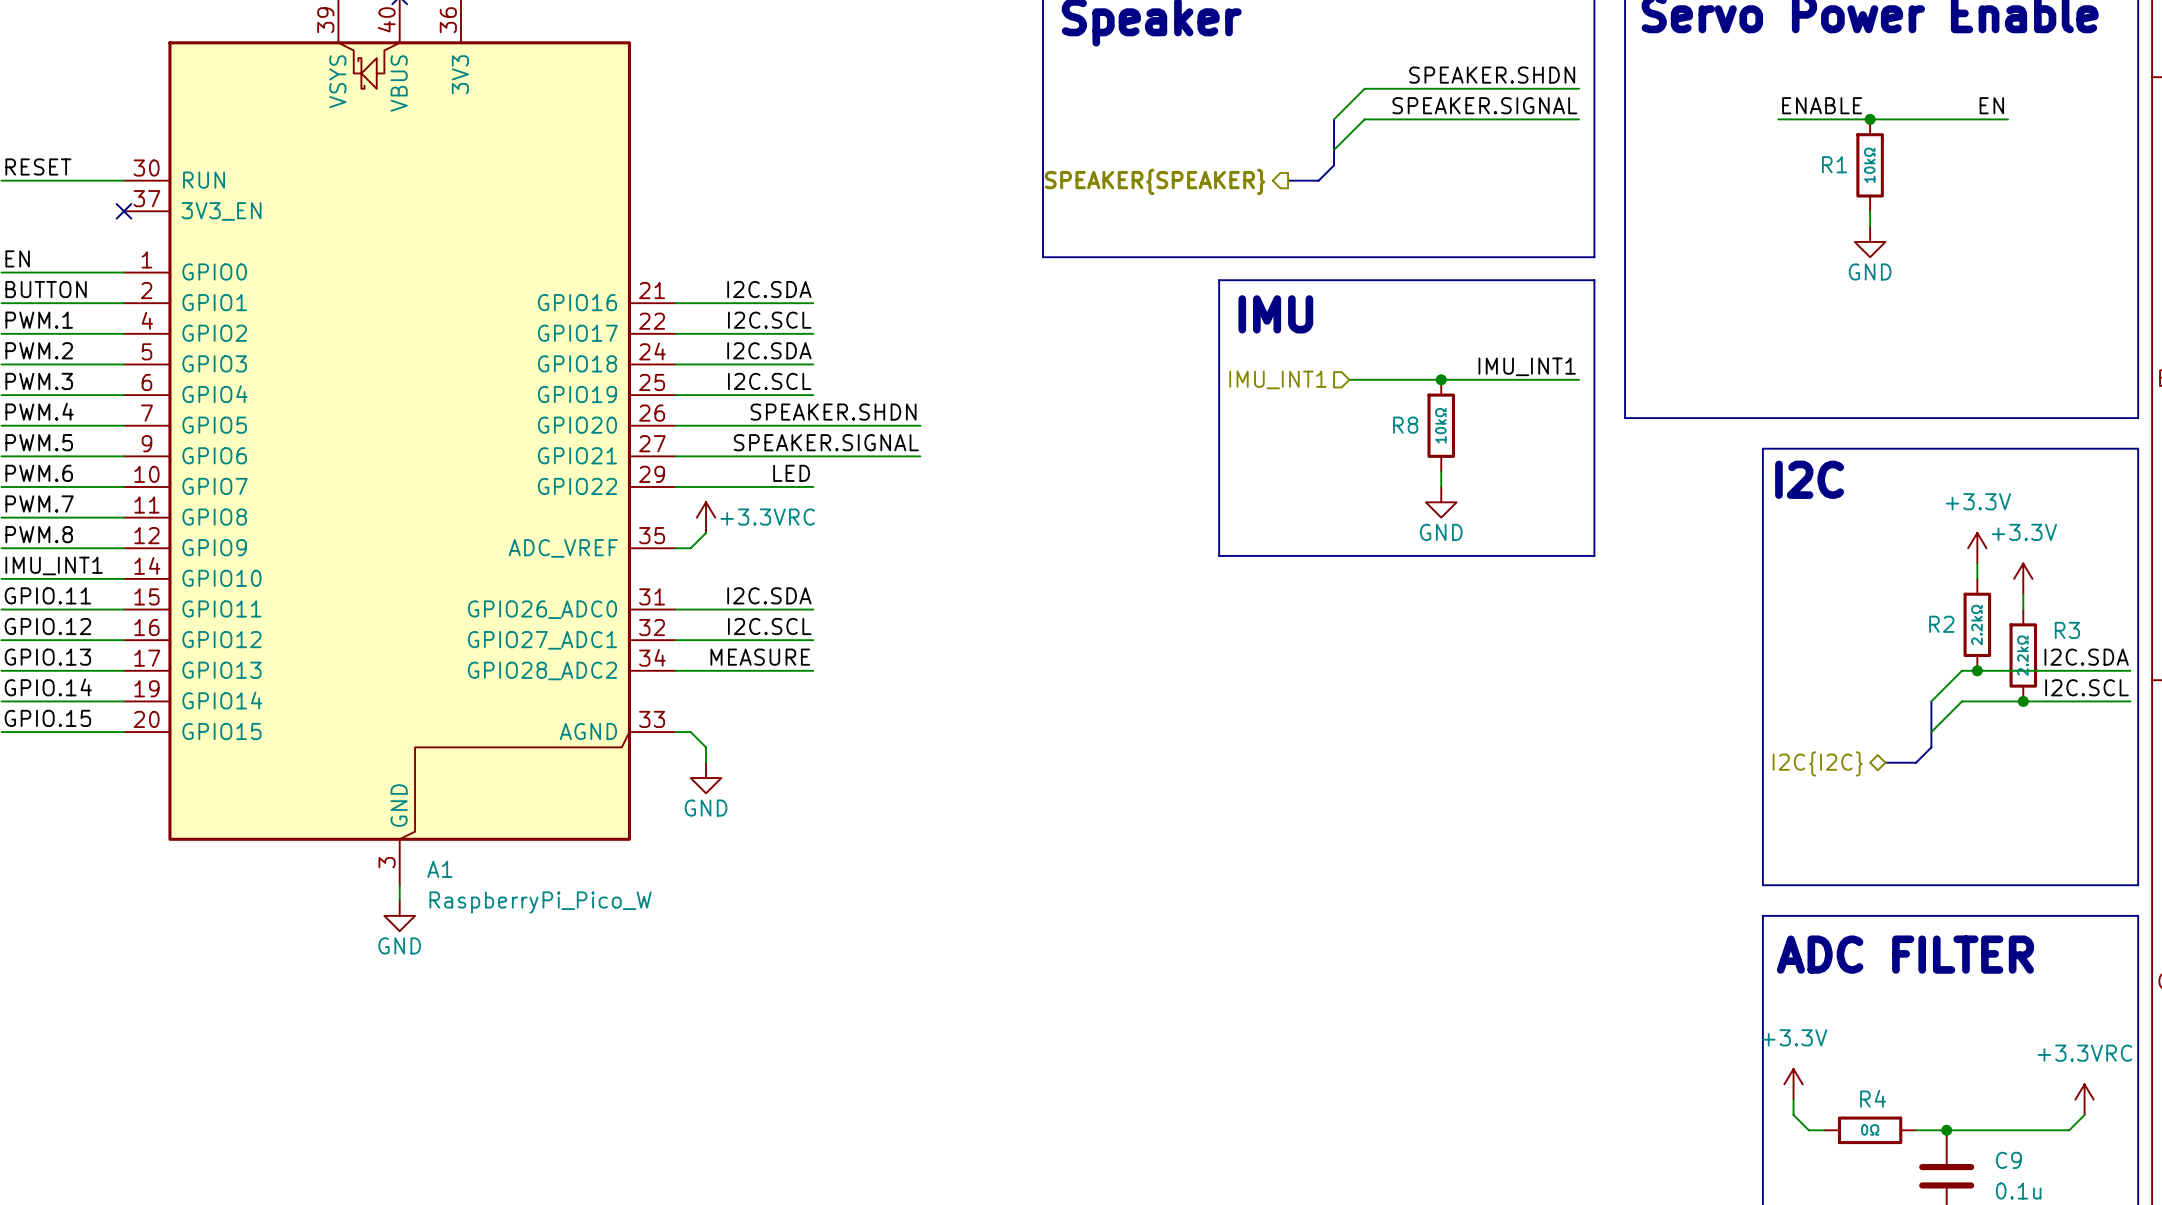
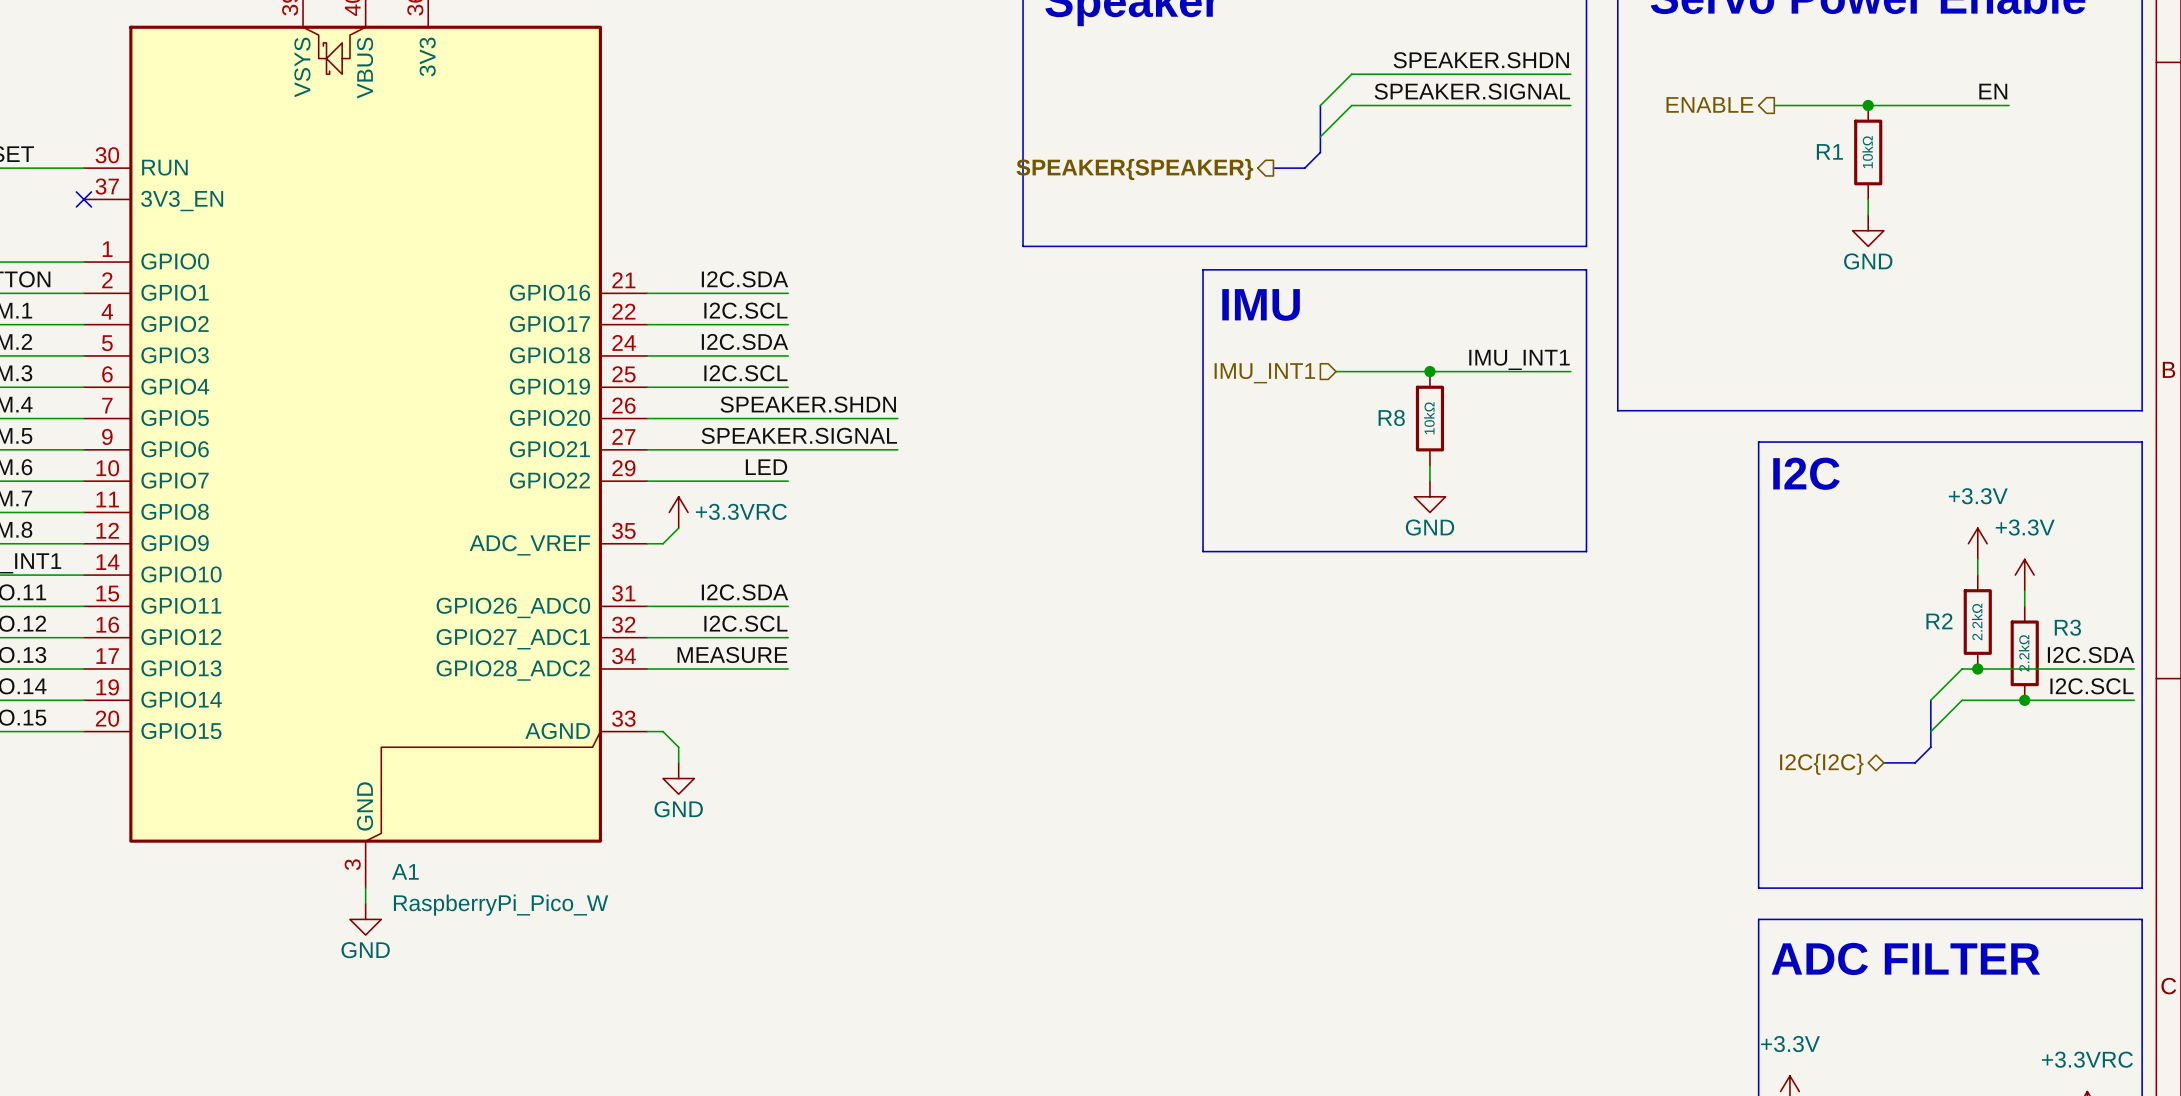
label: ENABLE (1822, 105) -> none
hierarchical label: none -> ENABLE (1709, 104)

